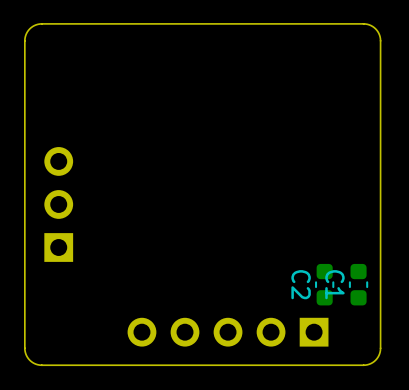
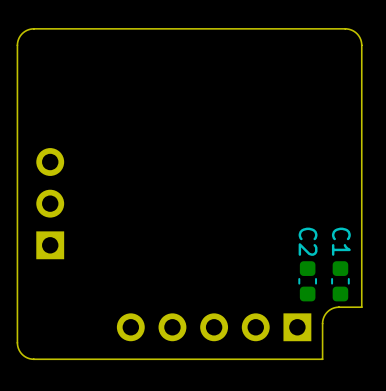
C2 name position: C2 (301, 284) -> C2 (308, 241)
C1 name position: C1 (334, 284) -> C1 (341, 241)
board edge: (380, 311) (380, 350) (376, 358) (367, 364) (340, 365) -> (361, 307) (335, 307) (326, 313) (322, 321) (322, 359)

